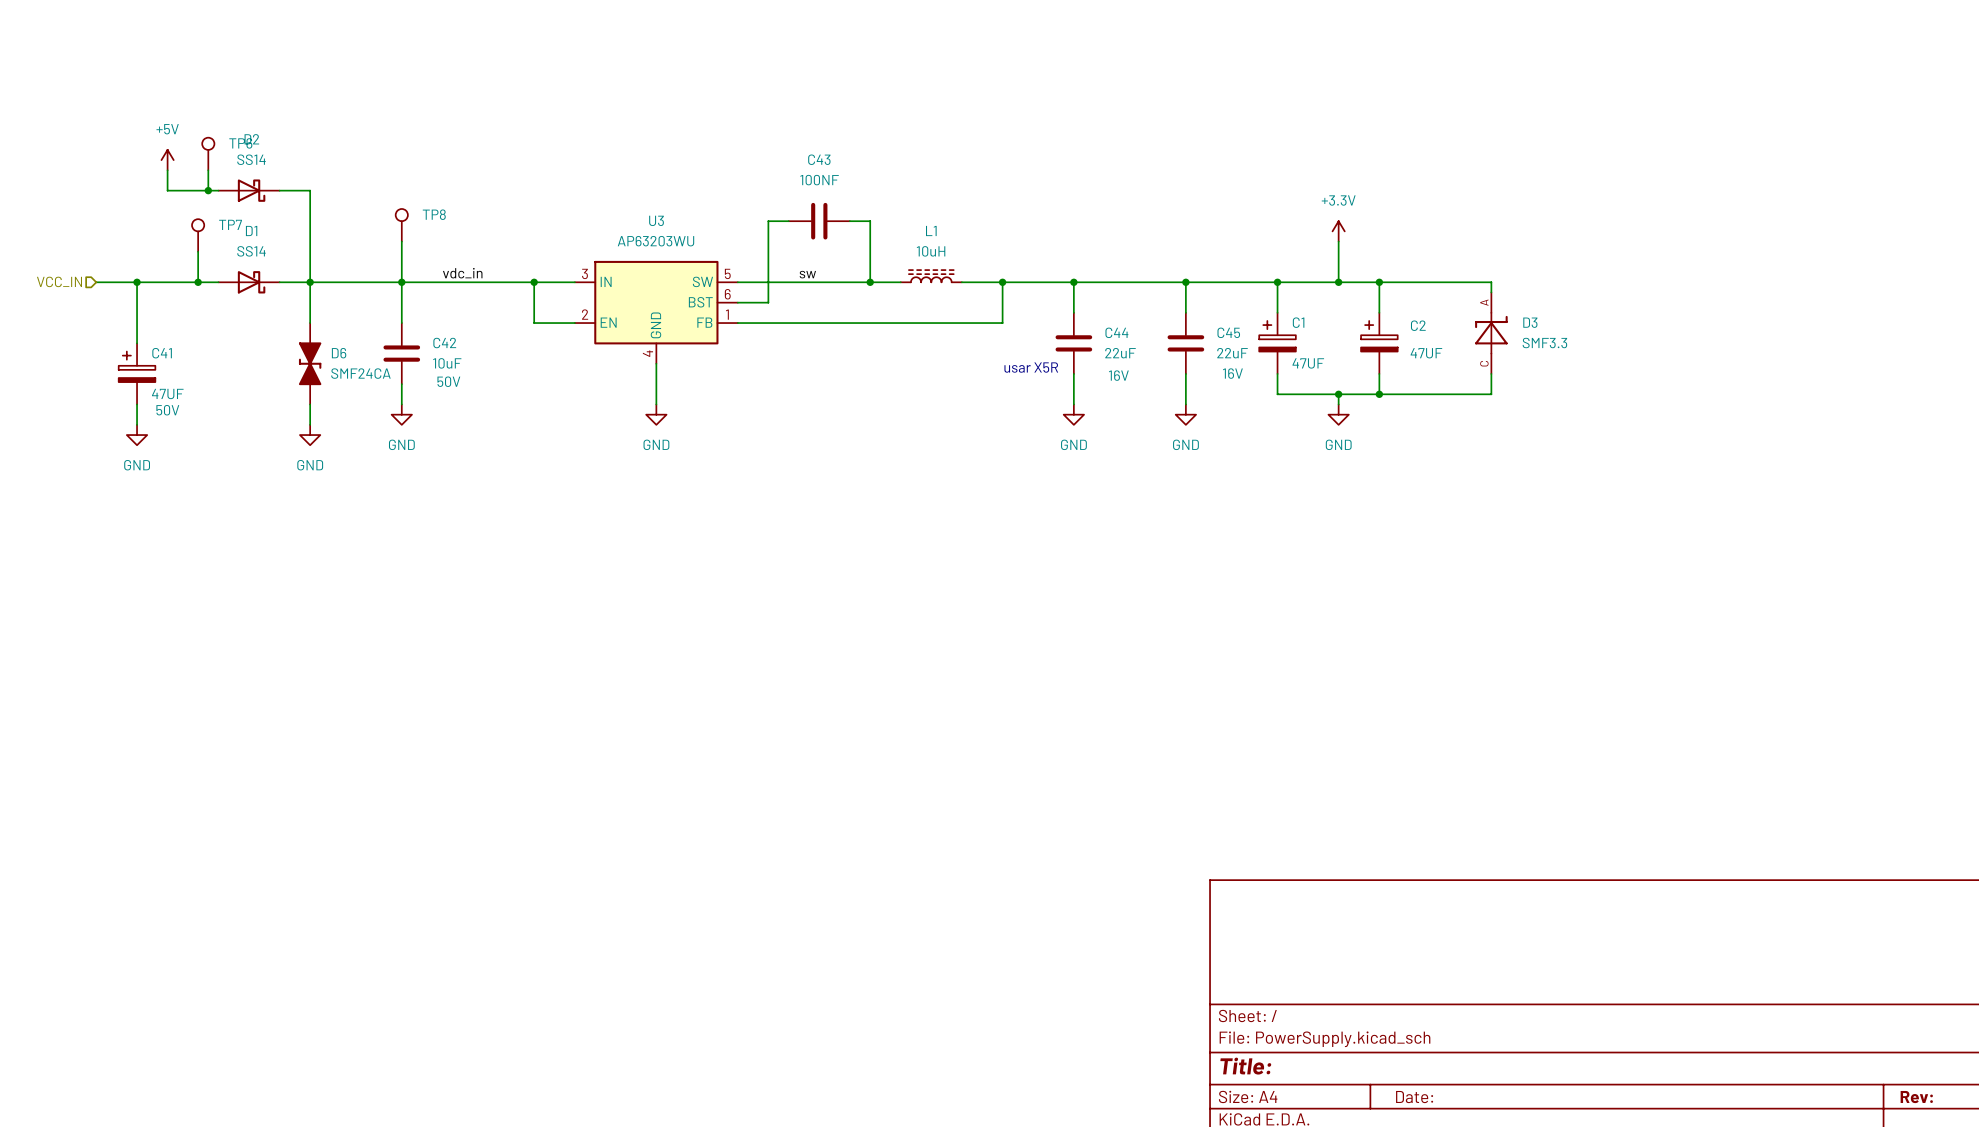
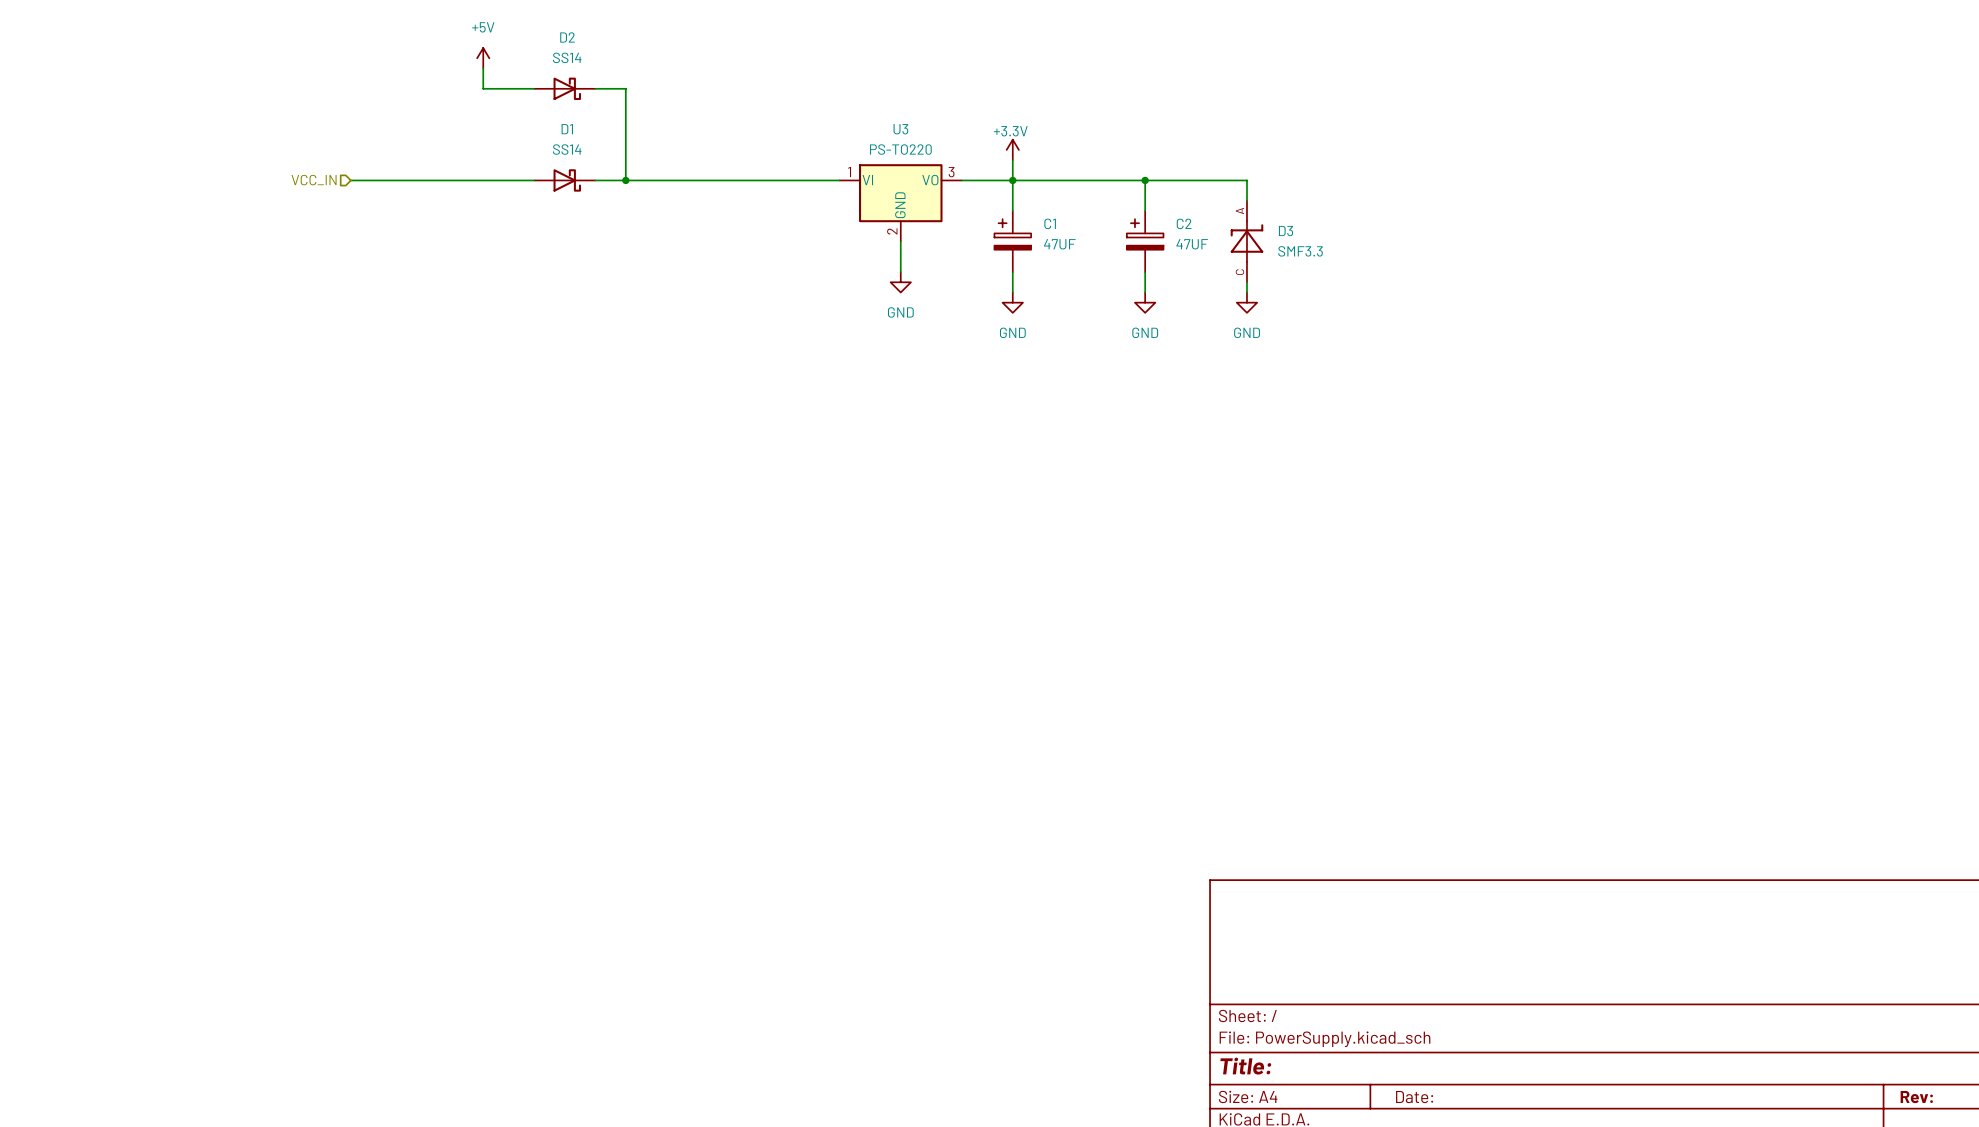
power symbol: none -> +5V (483, 58)
wire: none -> (483, 68) (483, 88) (534, 88)
wire: none -> (595, 88) (625, 88) (625, 180)
power symbol: none -> +3.3V (1012, 149)
TP6: (208, 153) -> none
power symbol: +5V (167, 160) -> none
wire: none -> (1012, 160) (1012, 211)
wire: (167, 170) (167, 190) (218, 190) -> none
wire: (208, 170) (208, 190) -> none
hierarchical label: none -> VCC_IN (314, 180)
wire: none -> (350, 180) (534, 180)
wire: none -> (595, 180) (839, 180)
junction: none -> (625, 180)
wire: none -> (961, 180) (1246, 180) (1246, 200)
junction: none -> (1012, 180)
junction: none -> (1145, 180)
junction: (208, 190) -> none
D2 position: (249, 190) -> (564, 88)
wire: (279, 190) (310, 190) (310, 323) -> none
U3 name position: U3 (656, 220) -> U3 (900, 129)
wire: (788, 221) (768, 221) (768, 302) (737, 302) -> none
C43: 100NF (819, 221) -> none
wire: (849, 221) (870, 221) (870, 282) -> none
TP8: (401, 225) -> none
power symbol: +3.3V (1338, 231) -> none
TP7: (198, 235) -> none
wire: (401, 241) (401, 323) -> none
U3 value: AP63203WU (655, 241) -> PS-TO220 (900, 149)
wire: (1338, 241) (1338, 282) -> none
wire: (198, 251) (198, 282) -> none
U3 symbol: [574, 260, 738, 364] -> [839, 164, 962, 242]
wire: none -> (1012, 272) (1012, 292)
wire: none -> (1145, 272) (1145, 292)
label: vdc_in (462, 273) -> none
label: sw (807, 274) -> none
L1: 10uH (931, 276) -> none
hierarchical label: VCC_IN (59, 281) -> none
wire: (96, 282) (218, 282) -> none
wire: (137, 282) (137, 343) -> none
junction: (137, 282) -> none
junction: (198, 282) -> none
D1 position: (249, 282) -> (564, 180)
wire: (279, 282) (574, 282) -> none
junction: (310, 282) -> none
junction: (401, 282) -> none
wire: (534, 282) (534, 323) (574, 323) -> none
junction: (534, 282) -> none
wire: (737, 282) (900, 282) -> none
junction: (870, 282) -> none
power symbol: none -> GND (900, 282)
wire: (961, 282) (1491, 282) (1491, 292) -> none
wire: (1002, 282) (1002, 323) (737, 323) -> none
junction: (1002, 282) -> none
wire: (1073, 282) (1073, 312) -> (900, 241) (900, 272)
junction: (1073, 282) -> none
wire: (1185, 282) (1185, 312) -> (1145, 180) (1145, 211)
junction: (1185, 282) -> none
wire: (1277, 282) (1277, 312) -> none
junction: (1277, 282) -> none
junction: (1338, 282) -> none
wire: (1379, 282) (1379, 312) -> none
junction: (1379, 282) -> none
power symbol: none -> GND (1012, 302)
power symbol: none -> GND (1145, 302)
power symbol: none -> GND (1246, 302)
C1 name position: C1 (1298, 322) -> C1 (1050, 223)
D3 position: (1491, 333) -> (1246, 241)
C44: 22uF (1073, 343) -> none
C45: 22uF (1185, 343) -> none
C1 position: (1277, 343) -> (1012, 241)
C2 position: (1379, 343) -> (1145, 241)
C42: 10uF (401, 353) -> none
C2 value position: 47UF (1426, 353) -> 47UF (1192, 244)
D6: SMF24CA (310, 363) -> none
wire: (656, 363) (656, 404) -> none
C1 value position: 47UF (1308, 363) -> 47UF (1059, 244)
text: usar X5R (1031, 367) -> none
C41: 47UF (137, 373) -> none
wire: (1073, 373) (1073, 404) -> none
wire: (1185, 373) (1185, 404) -> none
wire: (1277, 373) (1277, 394) (1491, 394) (1491, 373) -> none
wire: (1379, 373) (1379, 394) -> none
wire: (401, 384) (401, 404) -> none
wire: (1338, 394) (1338, 404) -> (1246, 282) (1246, 292)
junction: (1338, 394) -> none
junction: (1379, 394) -> none
wire: (137, 404) (137, 424) -> none
wire: (310, 404) (310, 424) -> none
power symbol: GND (401, 414) -> none
power symbol: GND (656, 414) -> none
power symbol: GND (1073, 414) -> none
power symbol: GND (1185, 414) -> none
power symbol: GND (1338, 414) -> none
power symbol: GND (137, 435) -> none
power symbol: GND (310, 435) -> none

